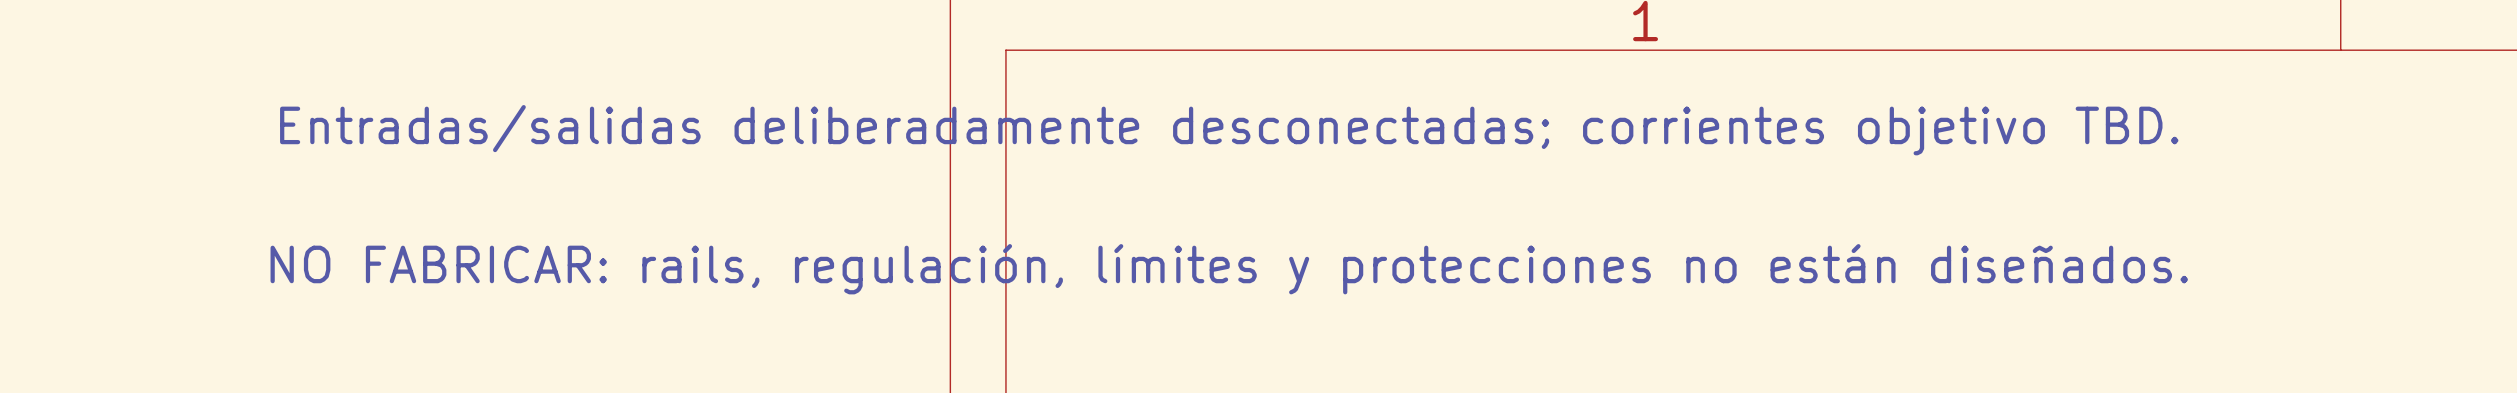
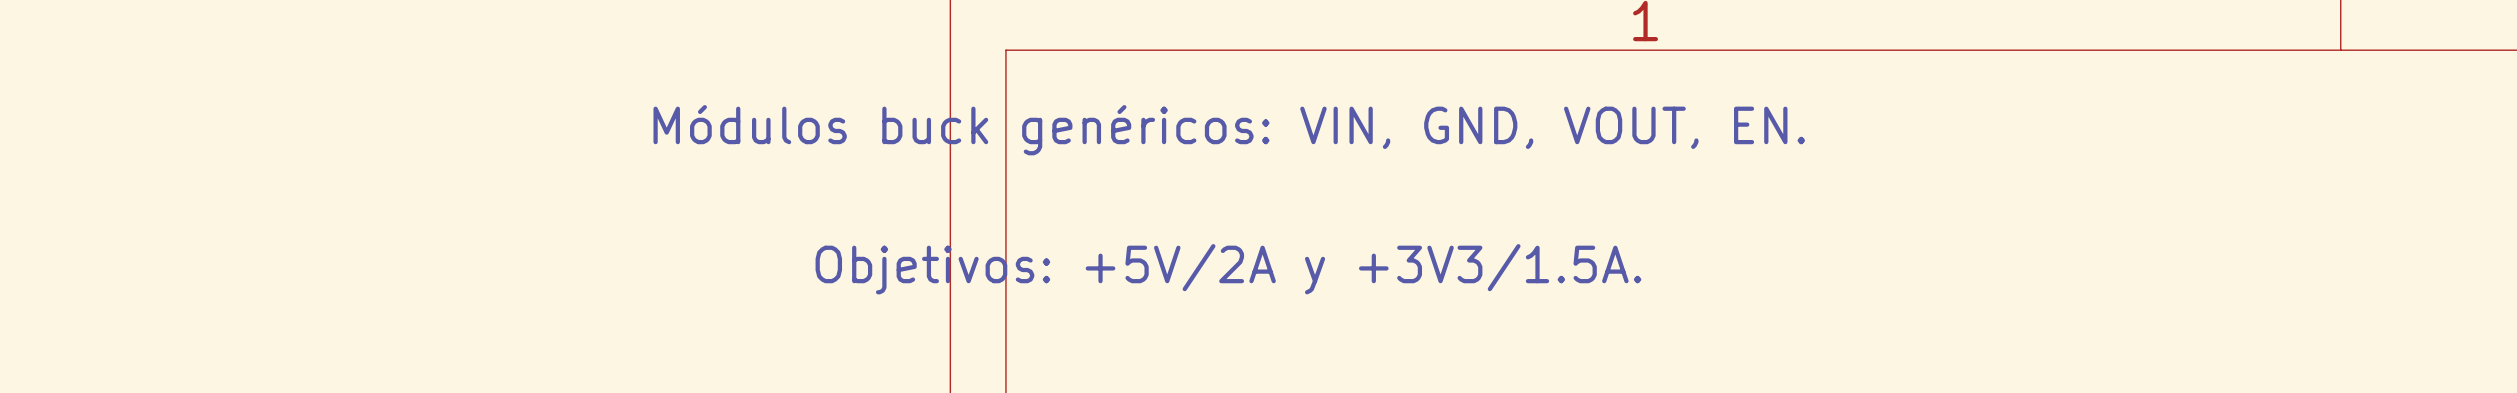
text: Entradas/salidas deliberadamente desconectadas; corrientes objetivo TBD. (1229, 130) -> Módulos buck genéricos: VIN, GND, VOUT, EN. (1229, 130)
text: NO FABRICAR: rails, regulación, límites y protecciones no están diseñados. (1229, 269) -> Objetivos: +5V/2A y +3V3/1.5A. (1228, 269)

